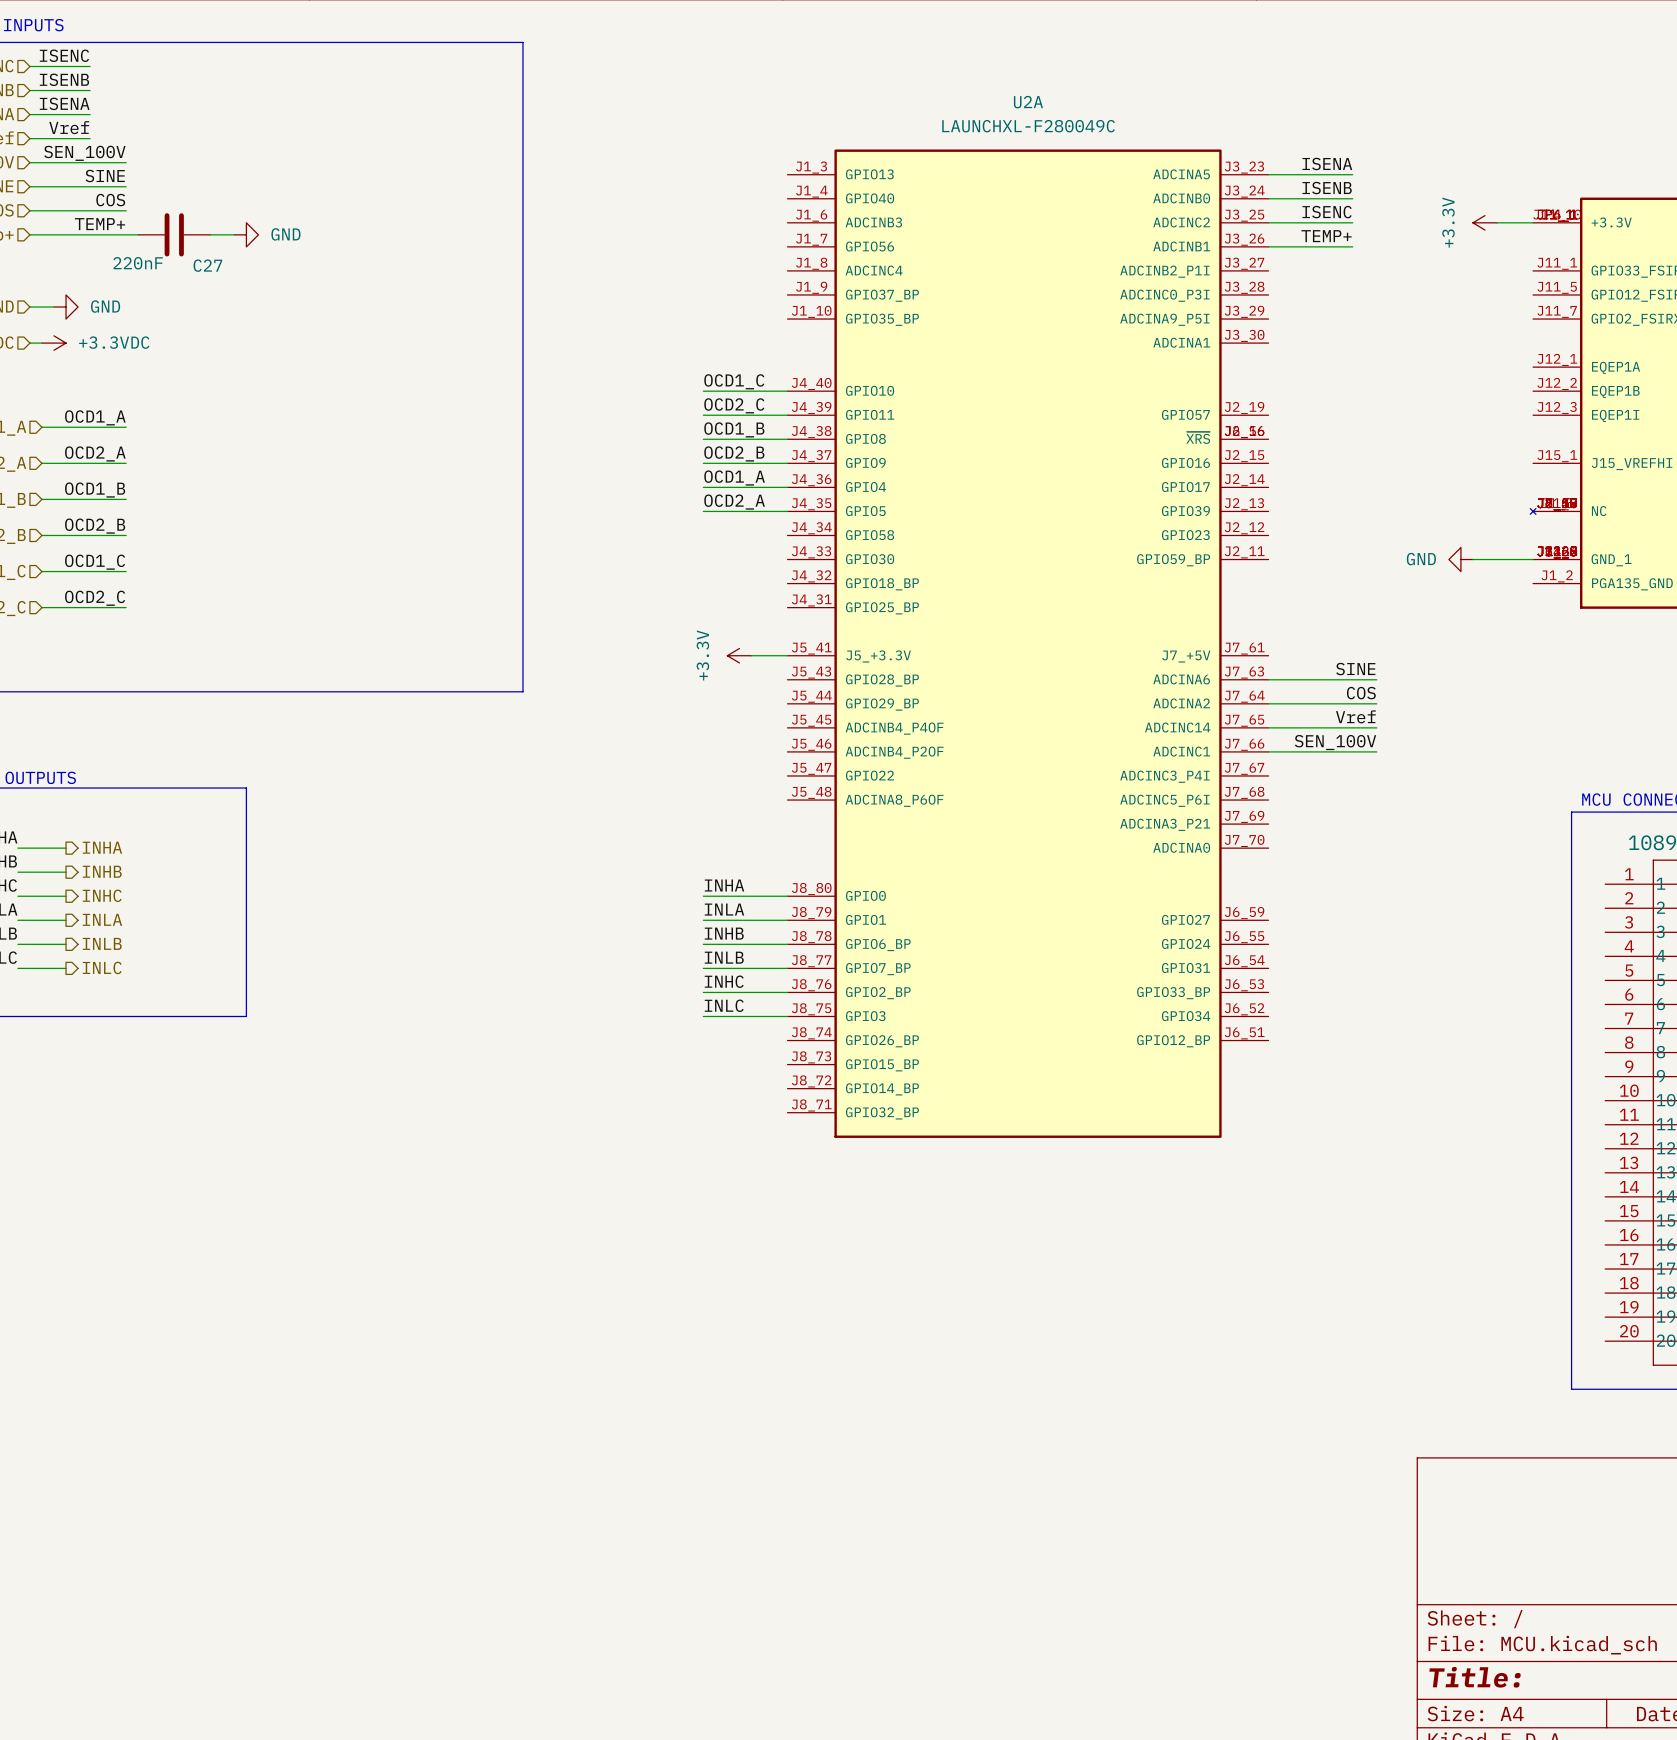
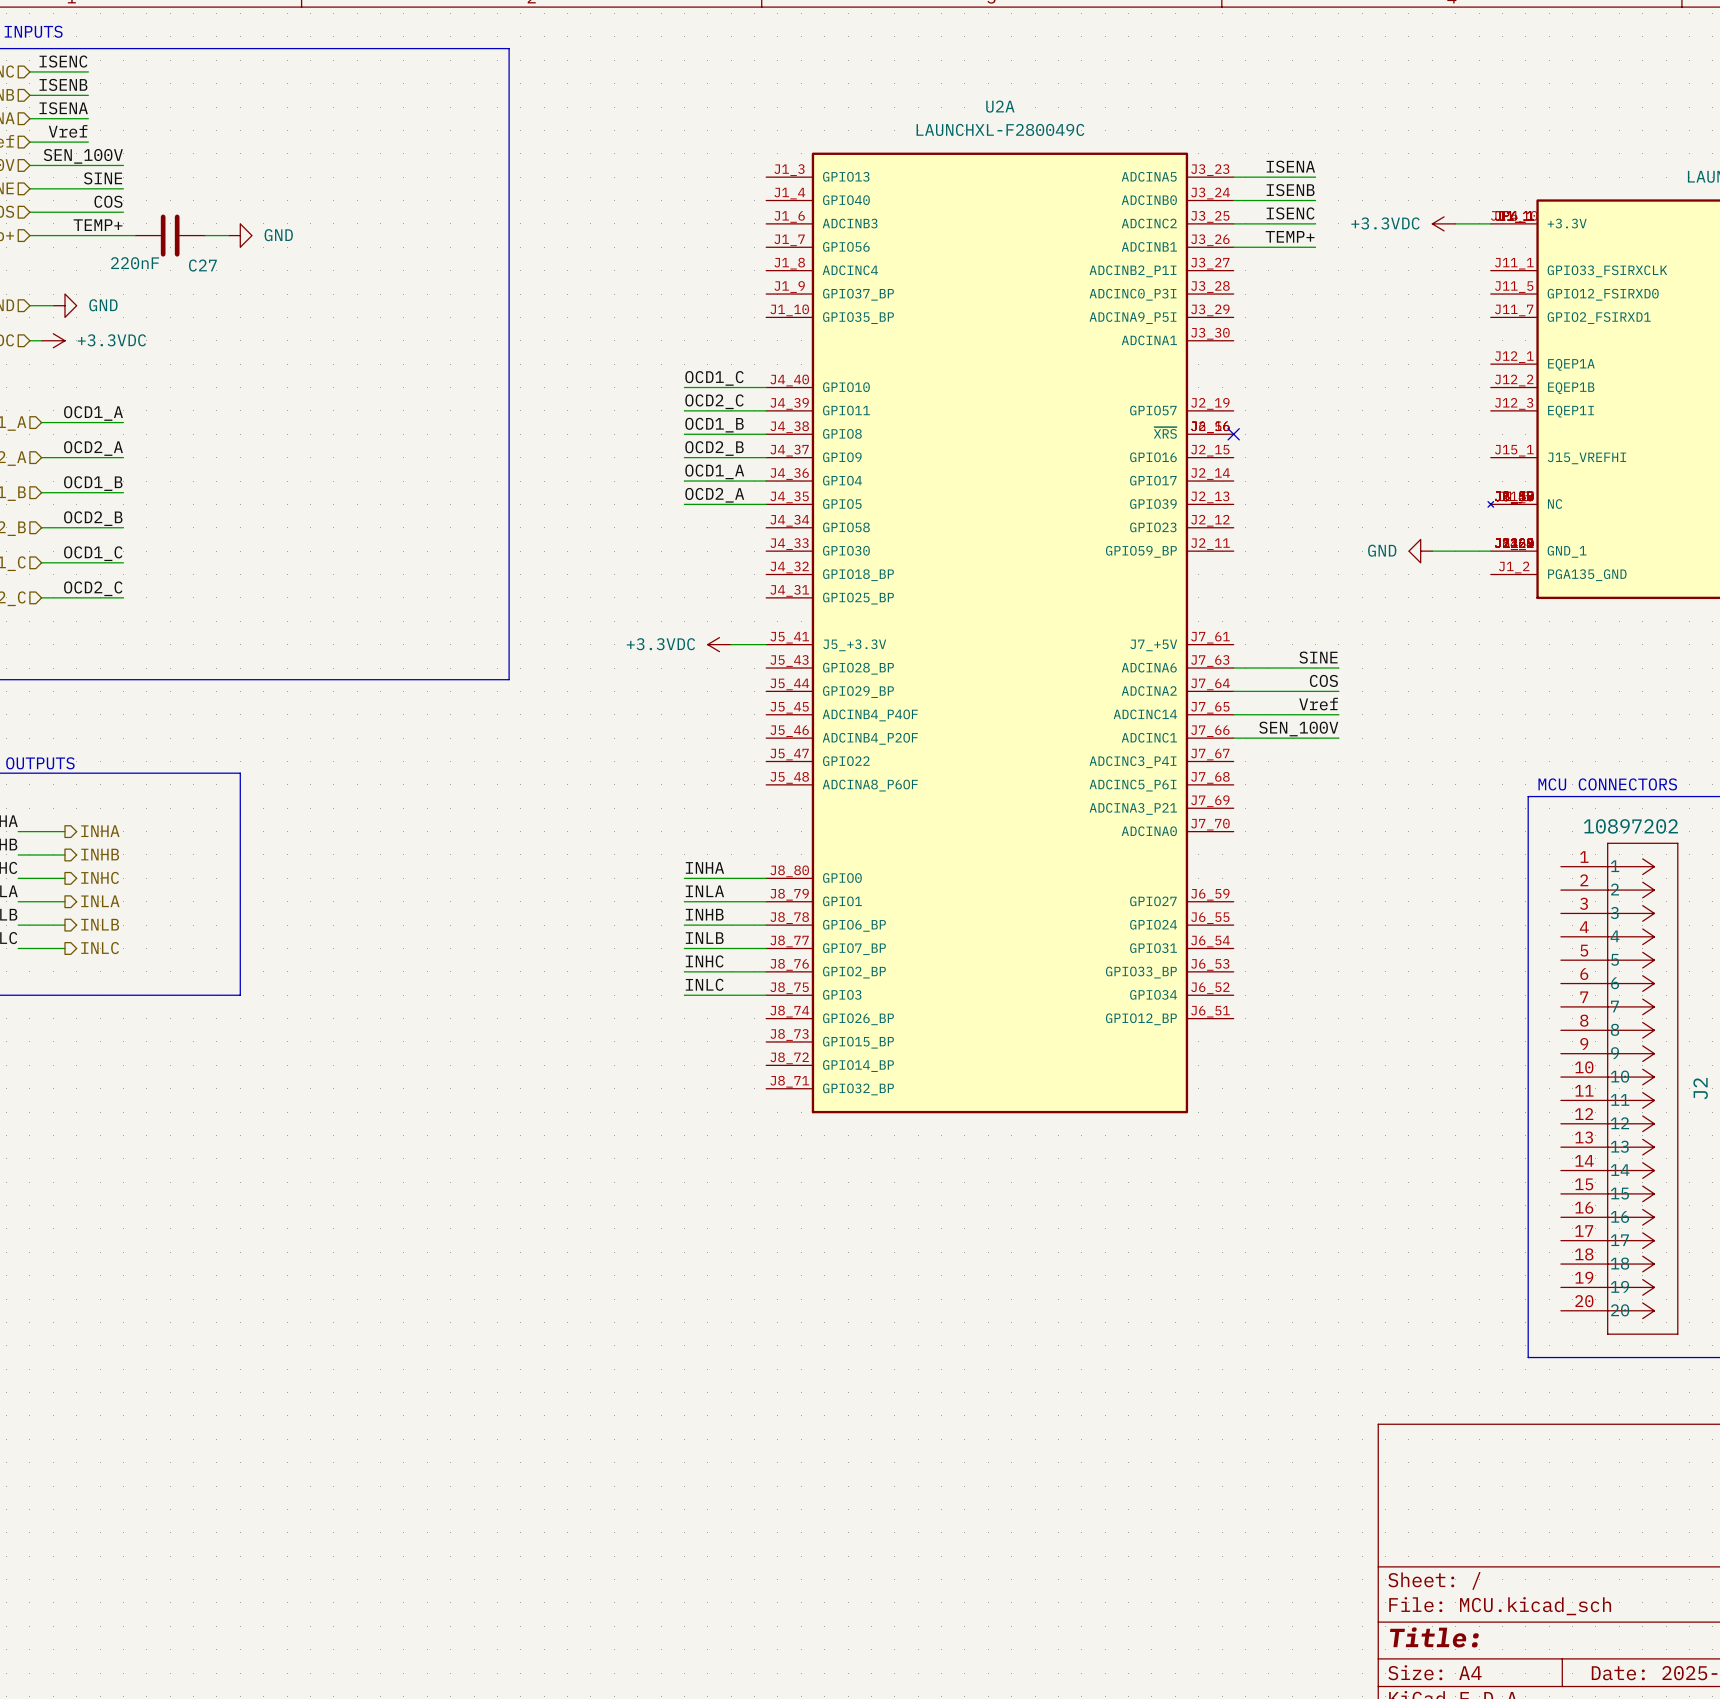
power symbol: +3.3V (1484, 222) -> +3.3VDC (1444, 223)
no-connect mark: none -> (1233, 434)
power symbol: +3.3V (739, 655) -> +3.3VDC (719, 644)

